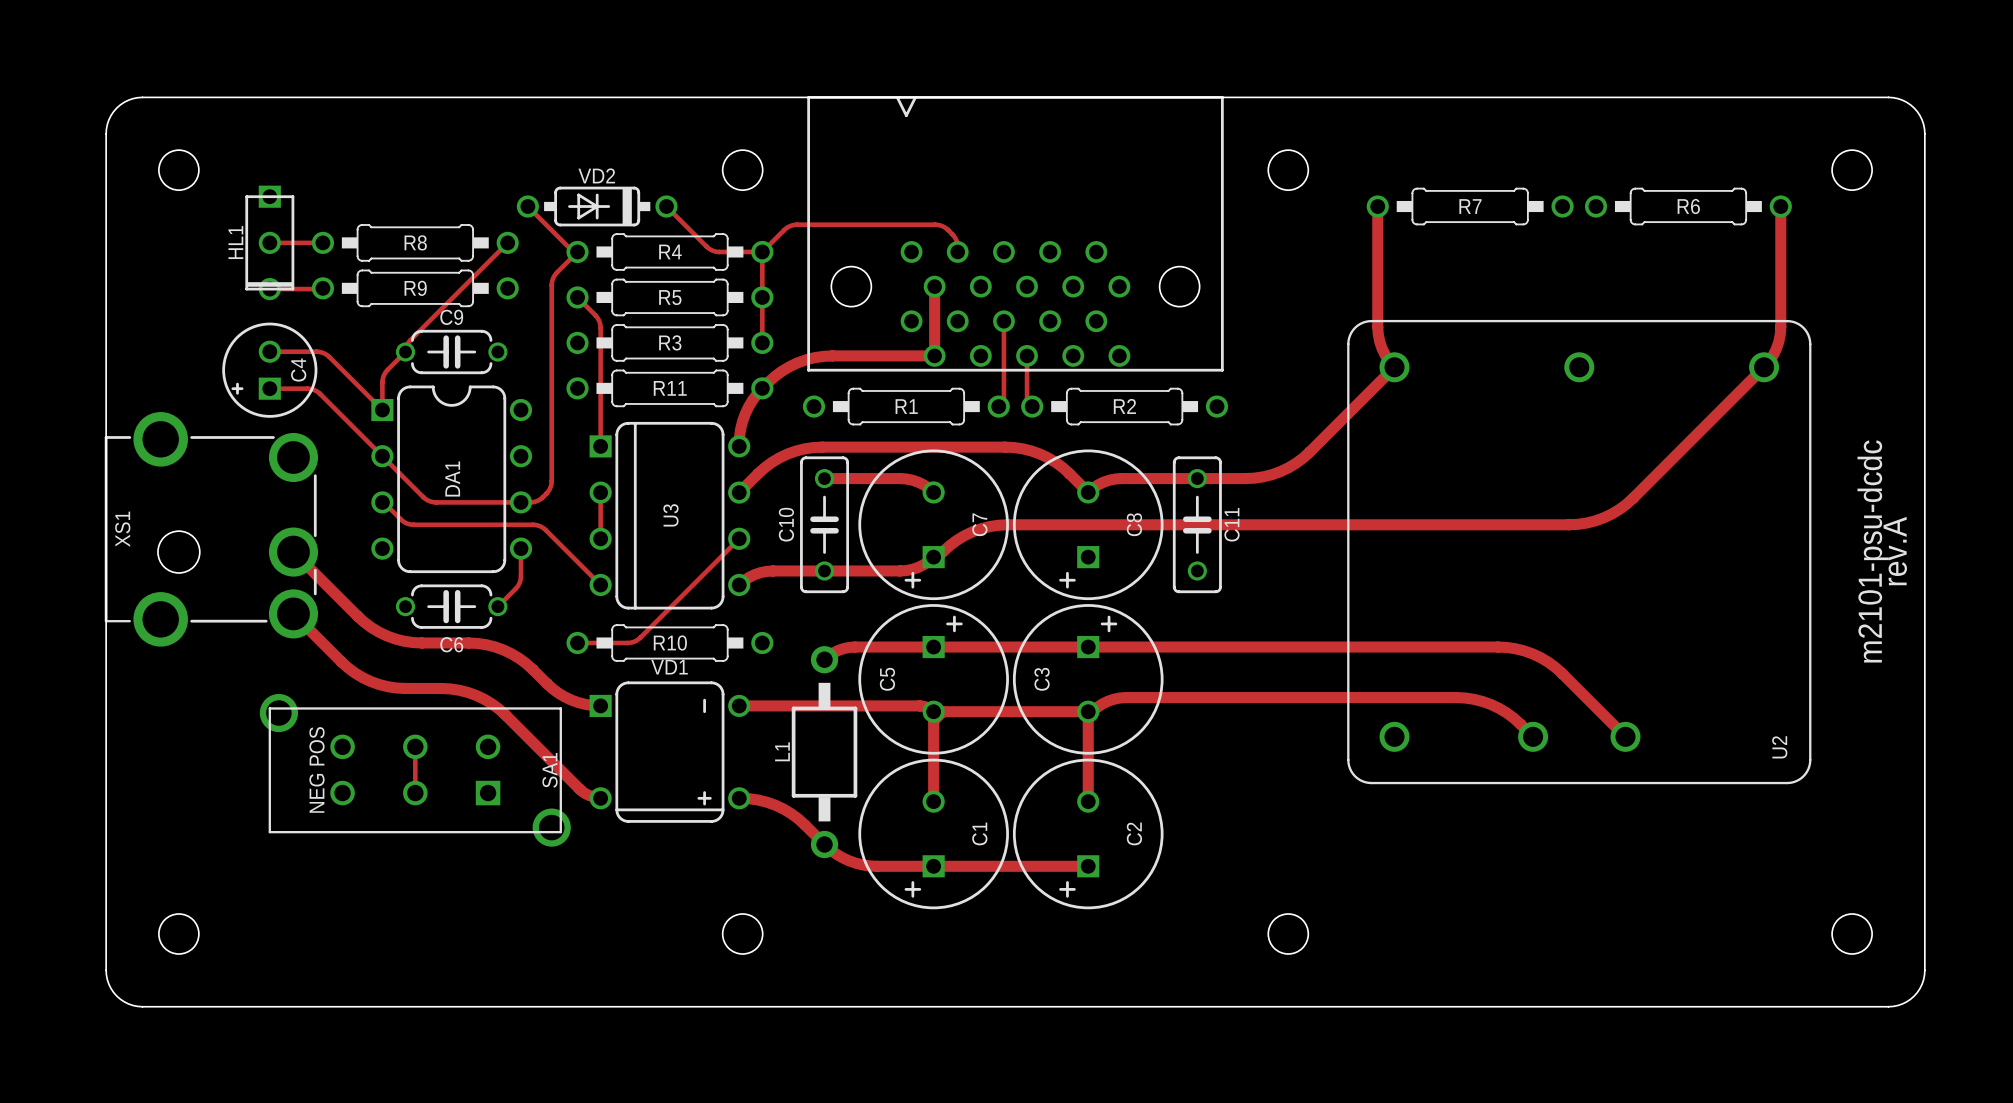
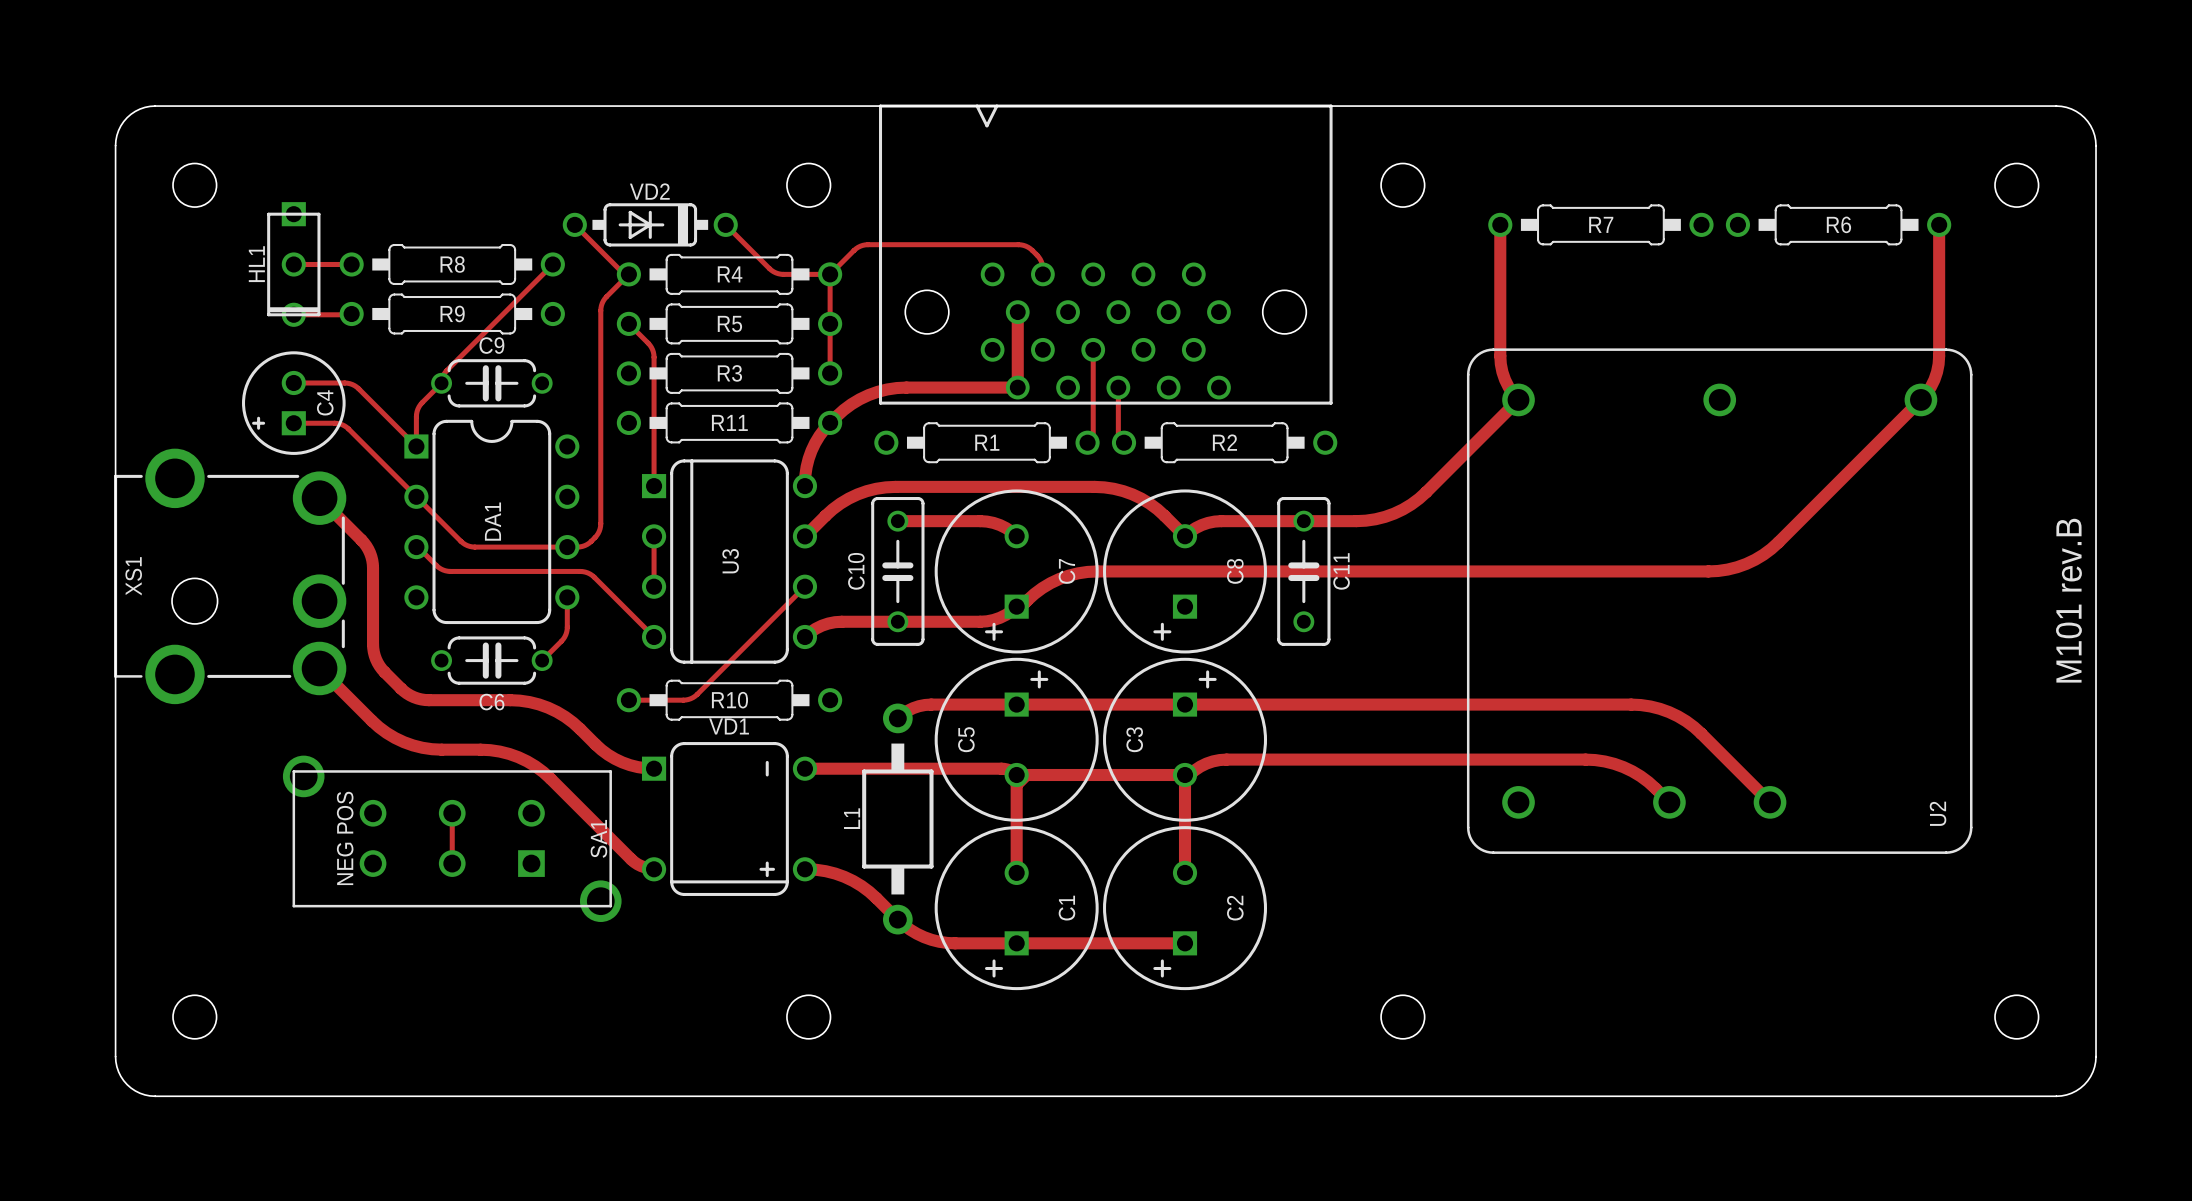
part text: m2101-psu-dcdc (1873, 551) -> none
part value: rev.A (1895, 551) -> M101 rev.B (2068, 600)
track: (293, 552) (371, 627) (395, 639) (422, 643) -> (319, 498) (361, 540) (370, 552) (373, 568) (373, 648) (379, 666) (401, 688) (413, 697) (425, 699) (459, 700)

